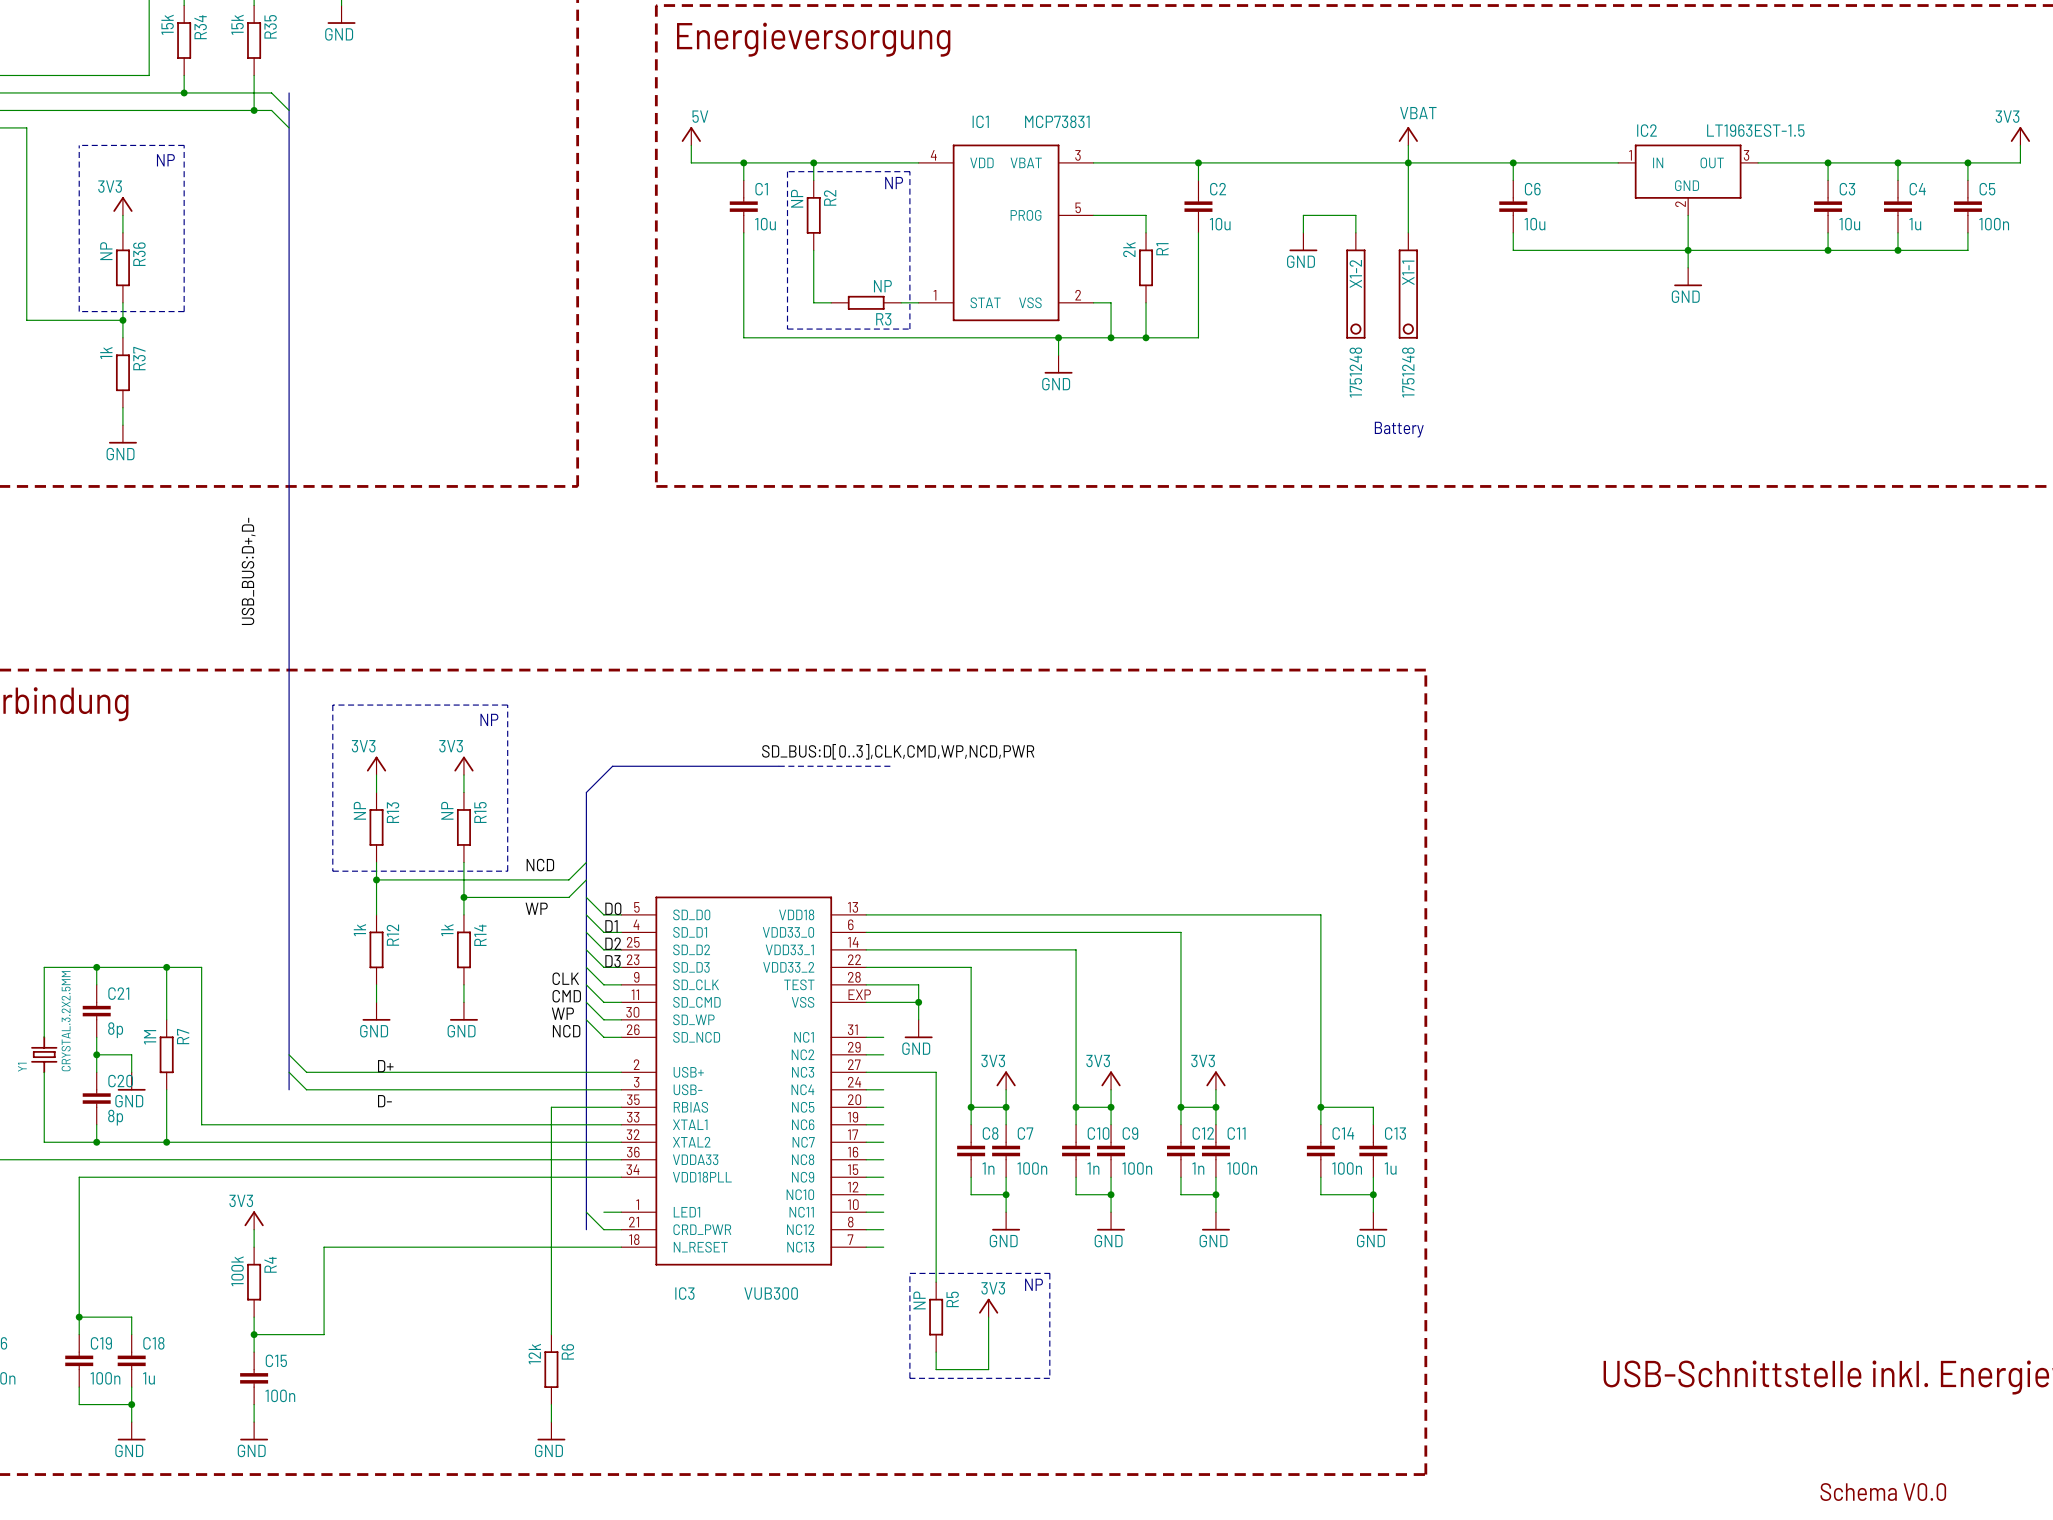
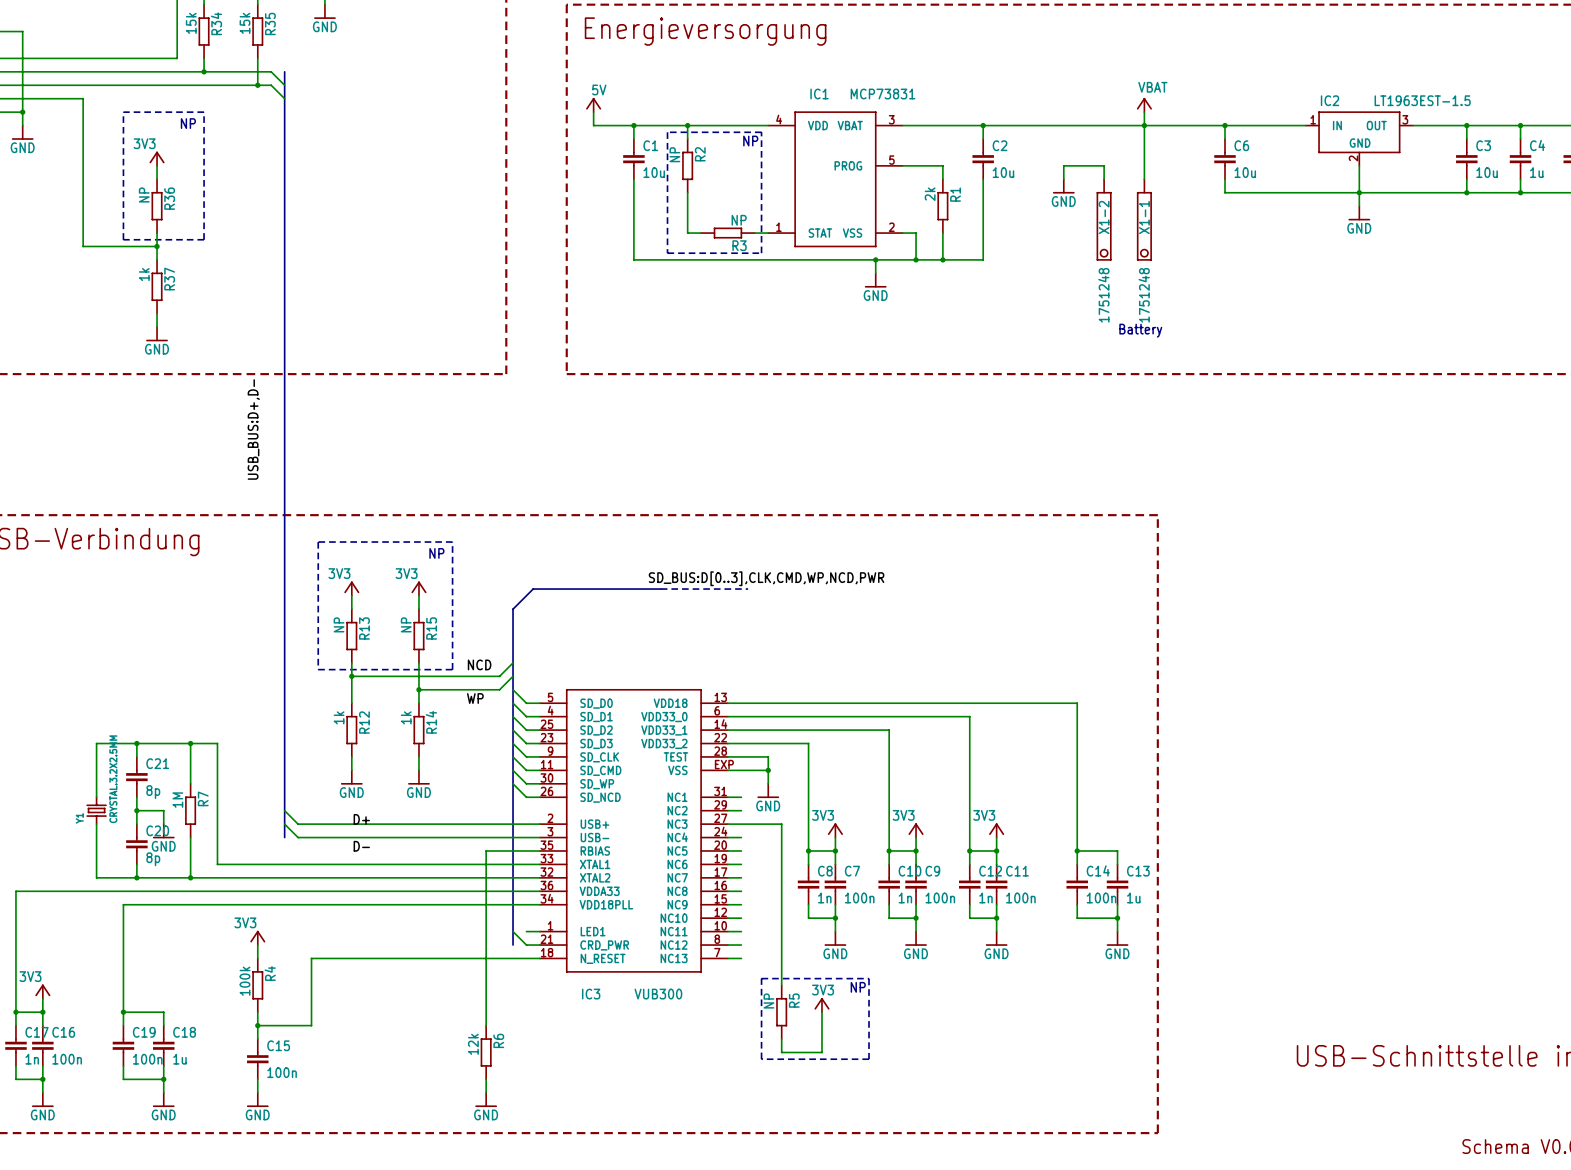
label: D0 (613, 908) -> none
label: D1 (611, 926) -> none
label: D2 (613, 943) -> none
label: D3 (613, 961) -> none
label: CLK (565, 978) -> none
label: CMD (566, 996) -> none
label: WP (562, 1013) -> none
label: NCD (566, 1031) -> none

